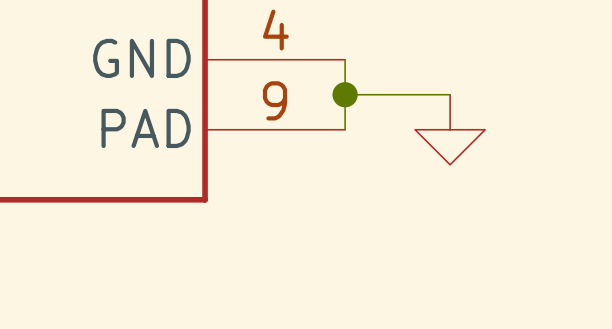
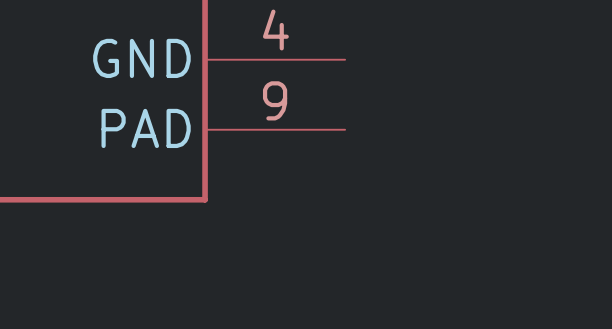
wire: (345, 59) (345, 129) -> none
wire: (345, 94) (450, 94) -> none
junction: (345, 94) -> none
power symbol: (450, 129) -> none

